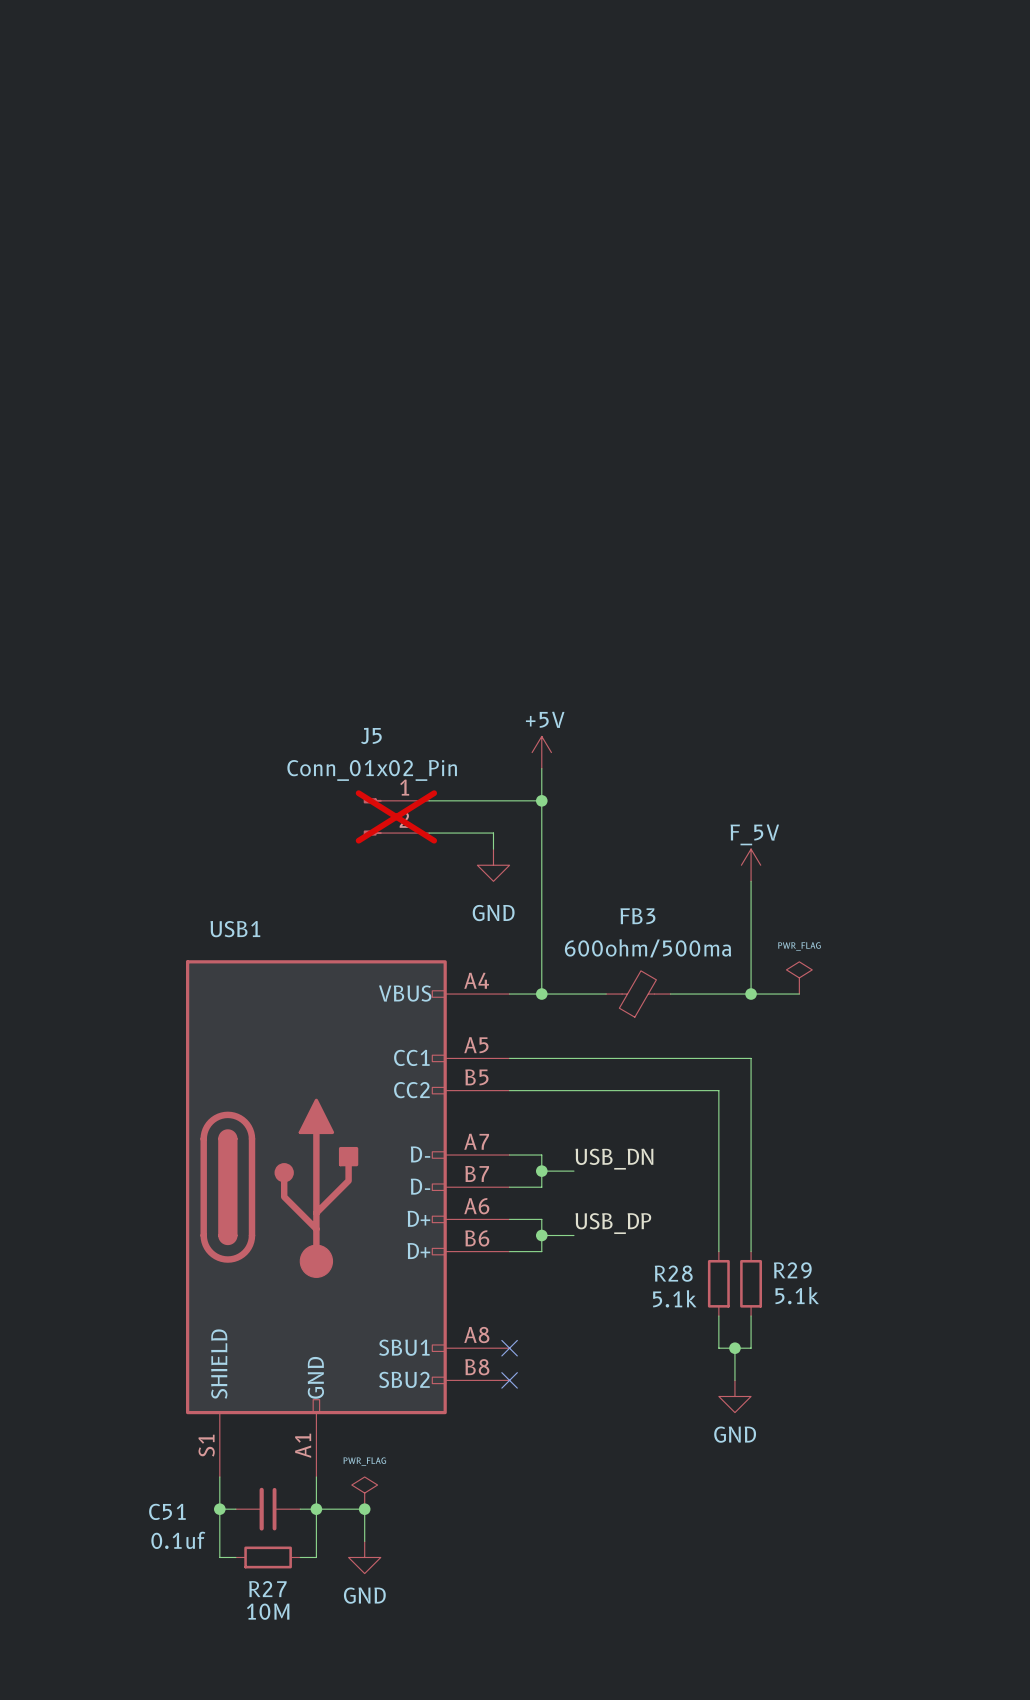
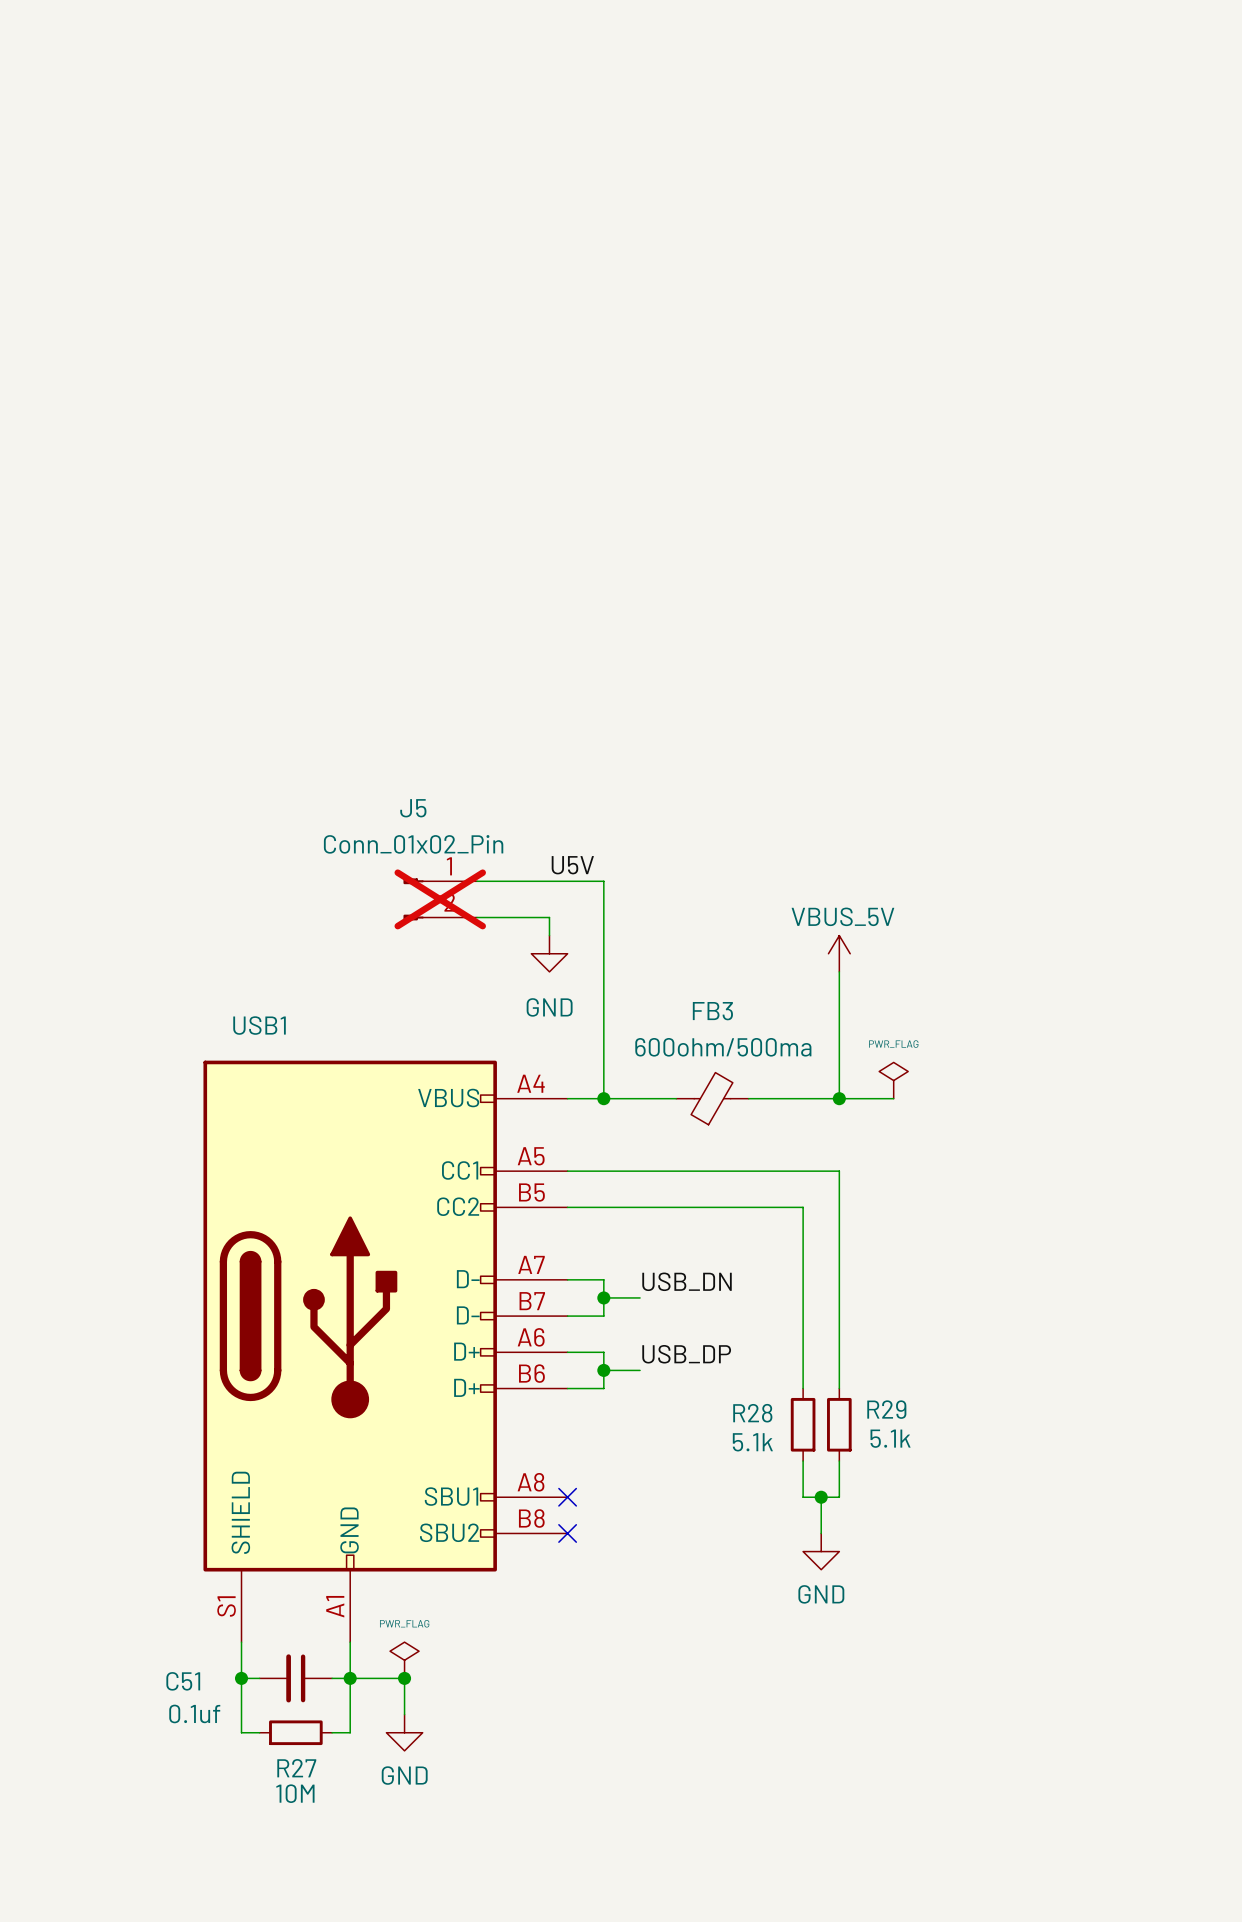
power symbol: +5V (541, 752) -> none
wire: (541, 768) (541, 800) -> none
label: none -> U5V (572, 865)
junction: (541, 800) -> none
power symbol: F_5V (751, 865) -> VBUS_5V (839, 953)

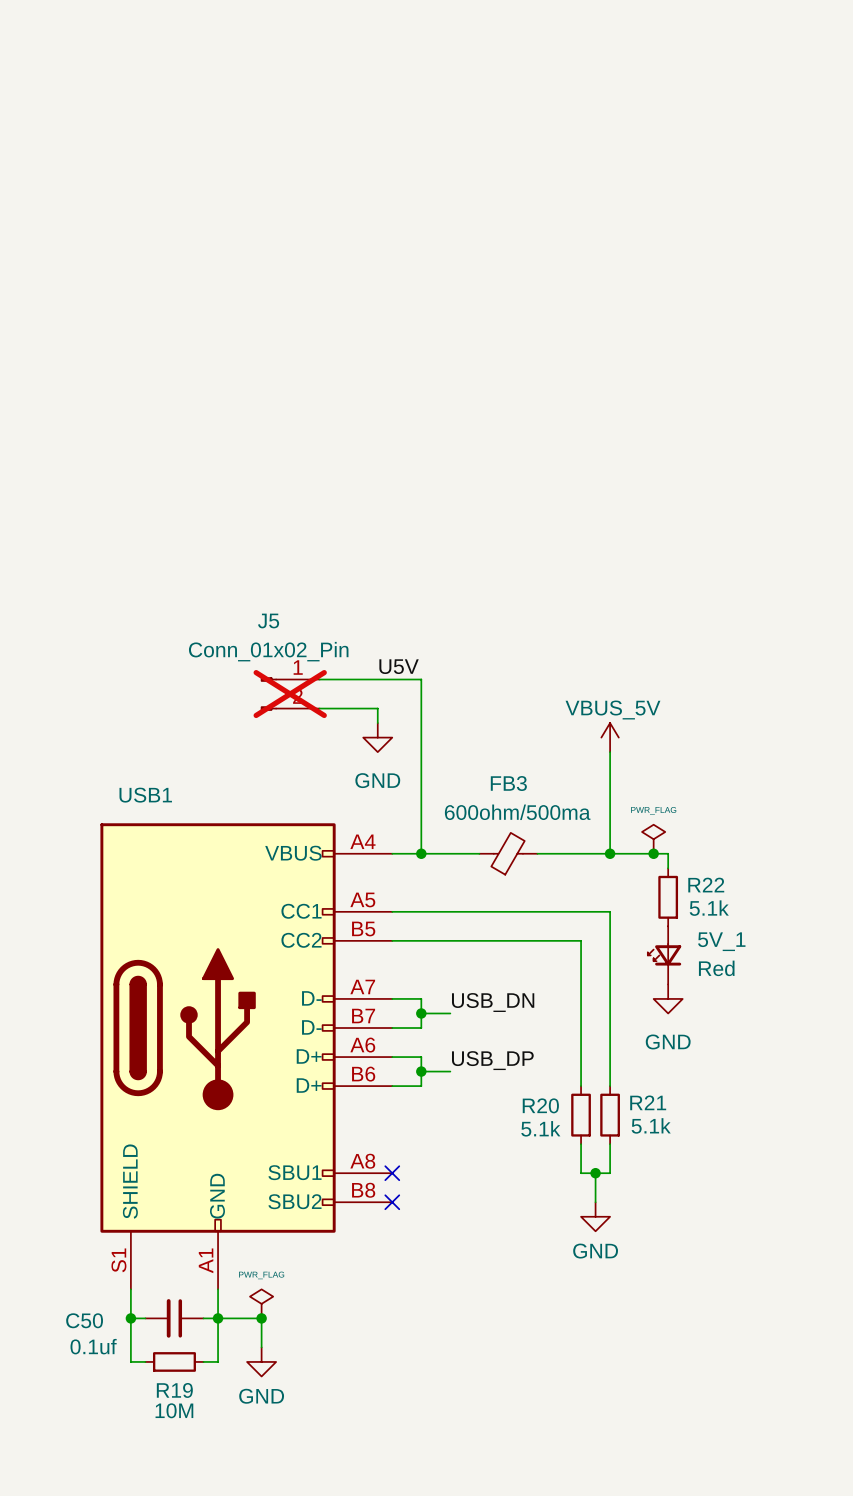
wire: none -> (653, 853) (668, 853) (668, 868)
junction: none -> (653, 853)
R22: none -> 5.1k (668, 897)
5V_1: none -> Red (664, 955)
power symbol: none -> GND (668, 998)
R29 name: R29 (886, 1409) -> R21 (648, 1102)
R28 name: R28 (752, 1413) -> R20 (540, 1105)
C51 name: C51 (183, 1681) -> C50 (84, 1320)
R27 name: R27 (296, 1768) -> R19 (174, 1390)

